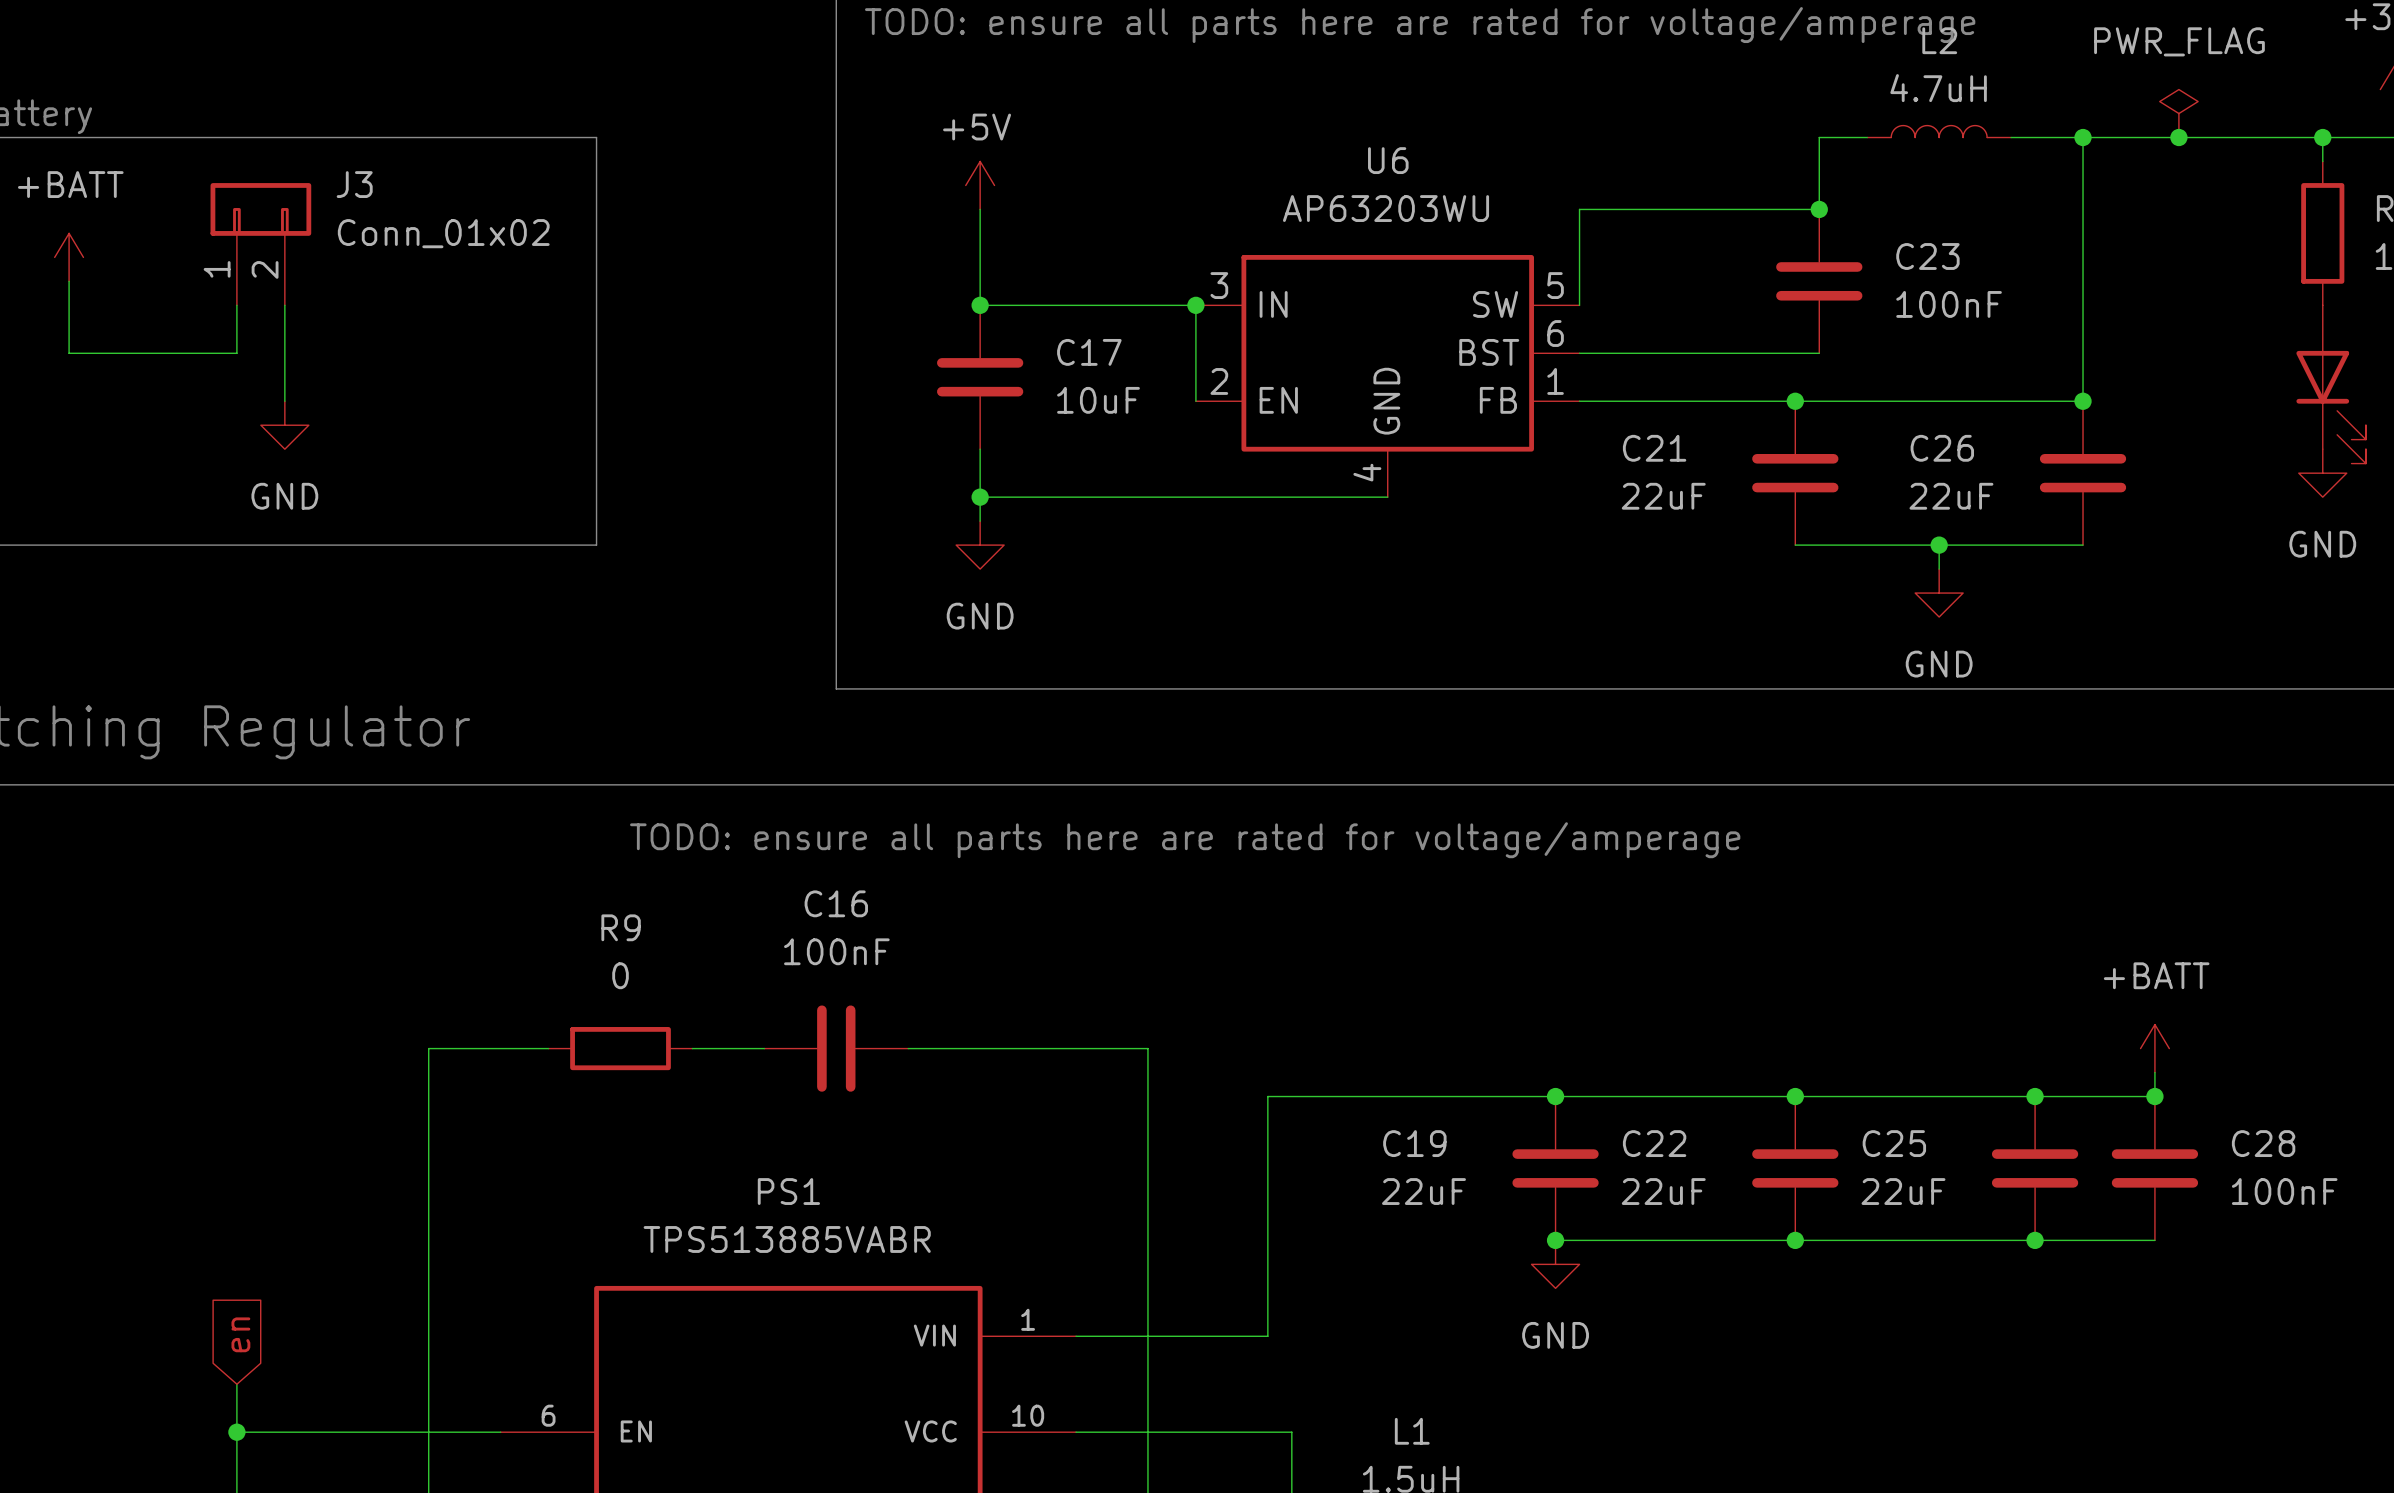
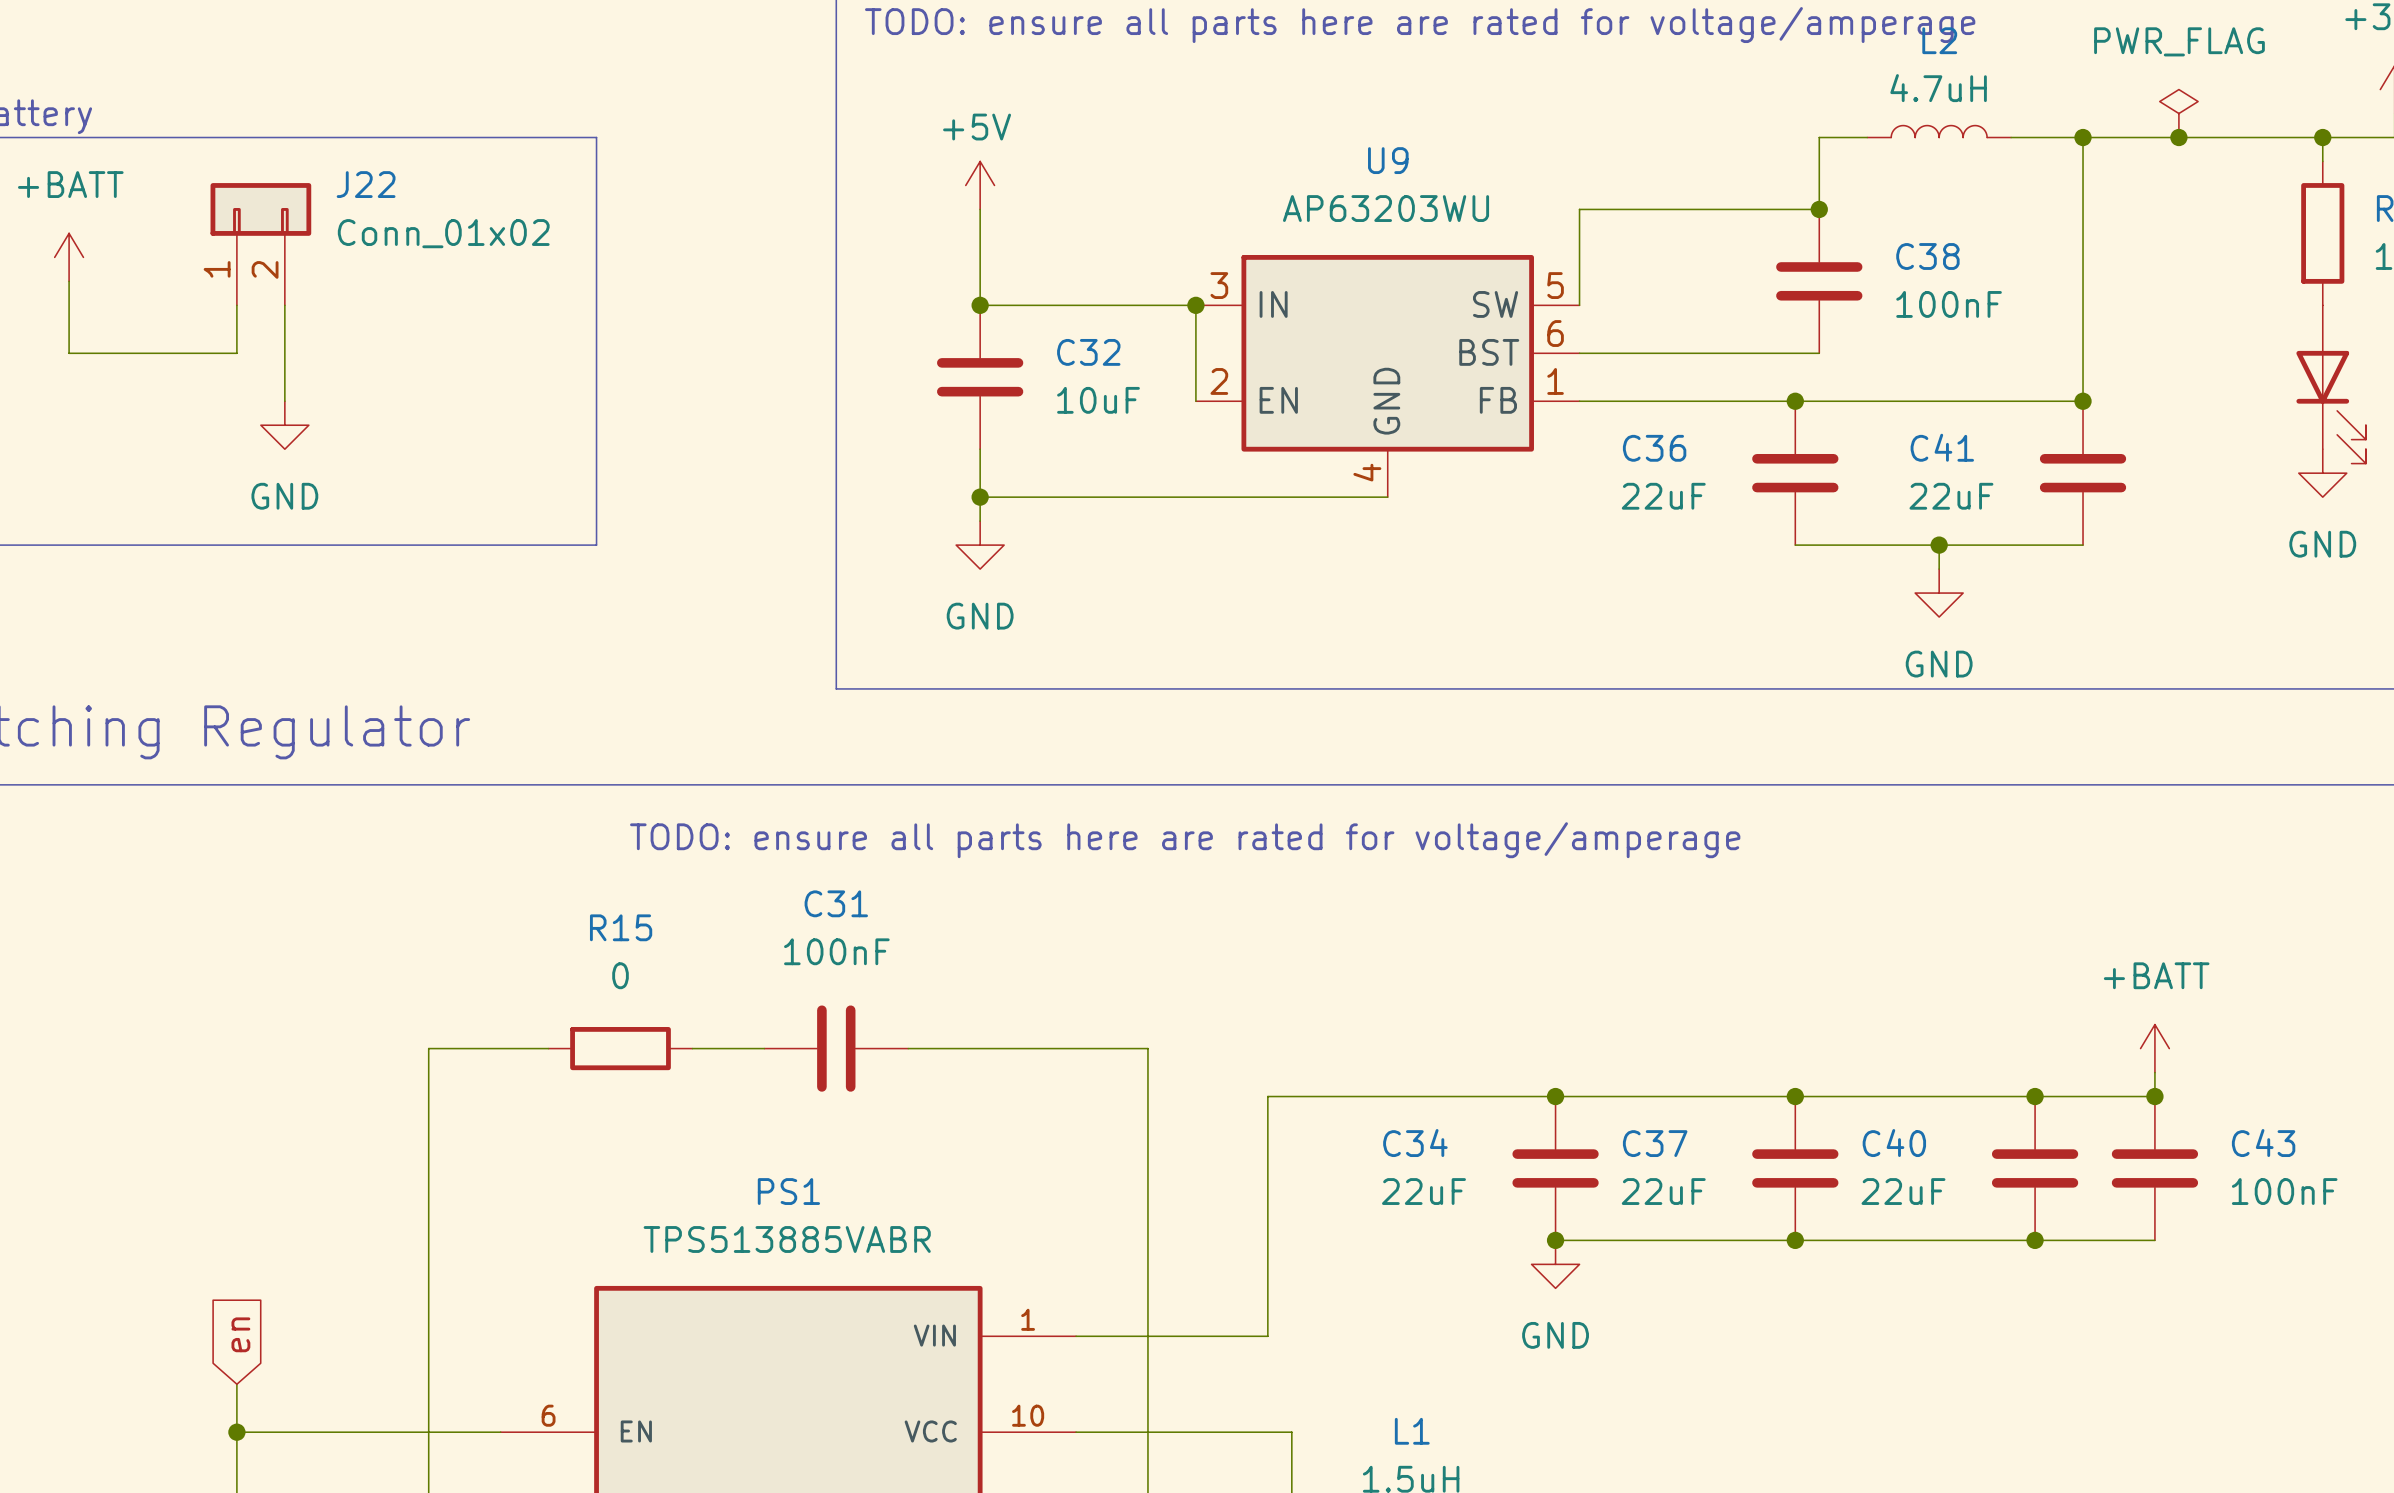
U6 name: U6 (1388, 160) -> U9 (1388, 160)
J3 name: J3 (354, 184) -> J22 (366, 184)
C23 name: C23 (1927, 256) -> C38 (1927, 256)
C17 name: C17 (1089, 352) -> C32 (1088, 352)
C21 name: C21 (1654, 448) -> C36 (1654, 448)
C26 name: C26 (1942, 448) -> C41 (1942, 447)
C16 name: C16 (836, 903) -> C31 (836, 903)
R9 name: R9 (621, 927) -> R15 (621, 927)
C19 name: C19 (1414, 1143) -> C34 (1415, 1143)
C22 name: C22 (1654, 1143) -> C37 (1655, 1143)
C25 name: C25 (1894, 1143) -> C40 (1894, 1143)
C28 name: C28 (2263, 1143) -> C43 (2263, 1143)

